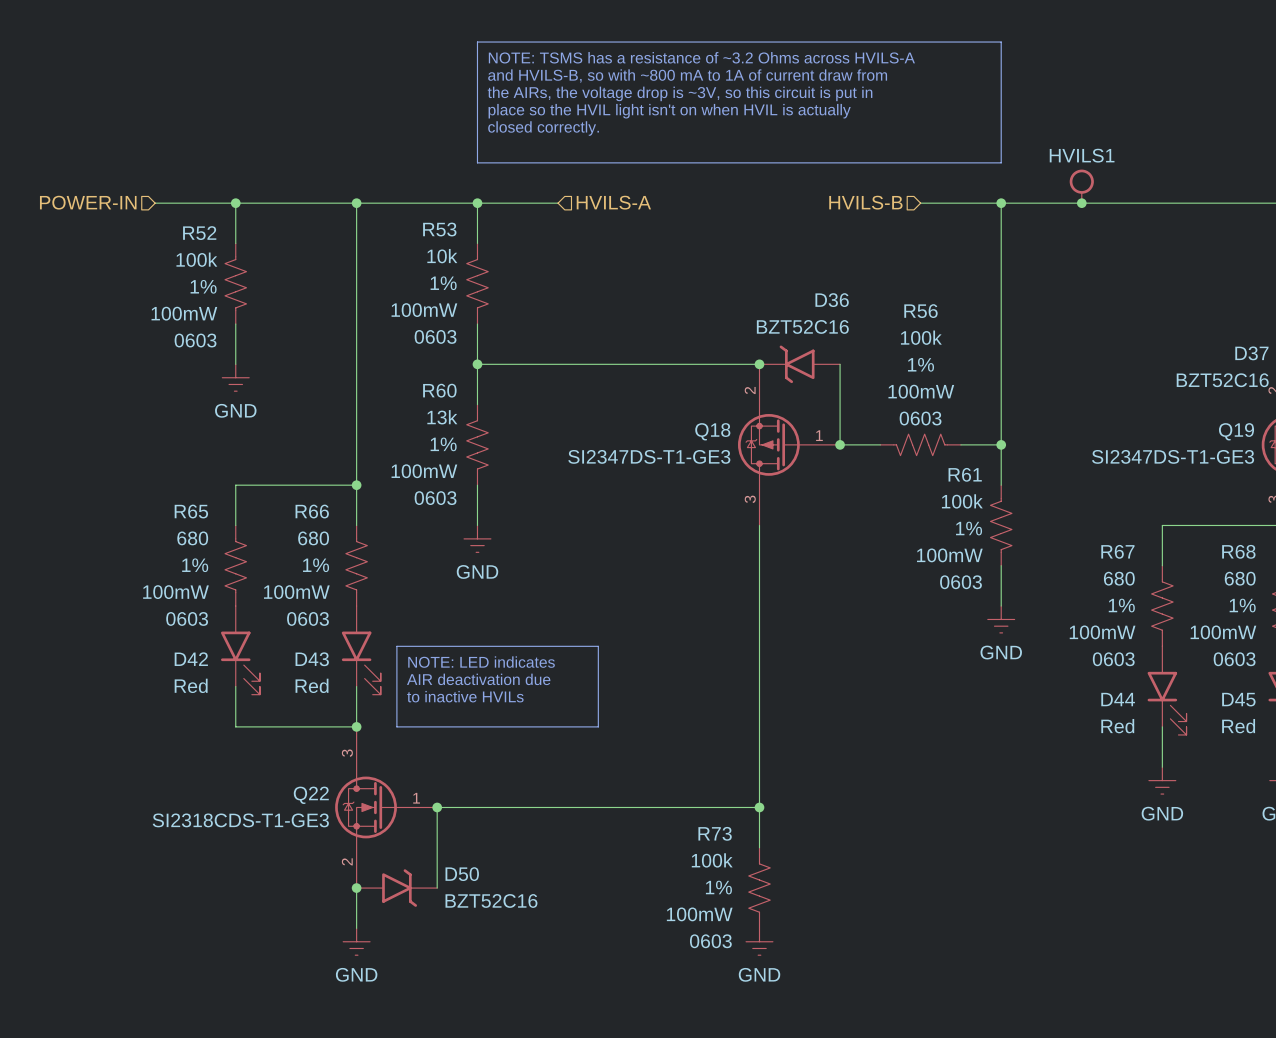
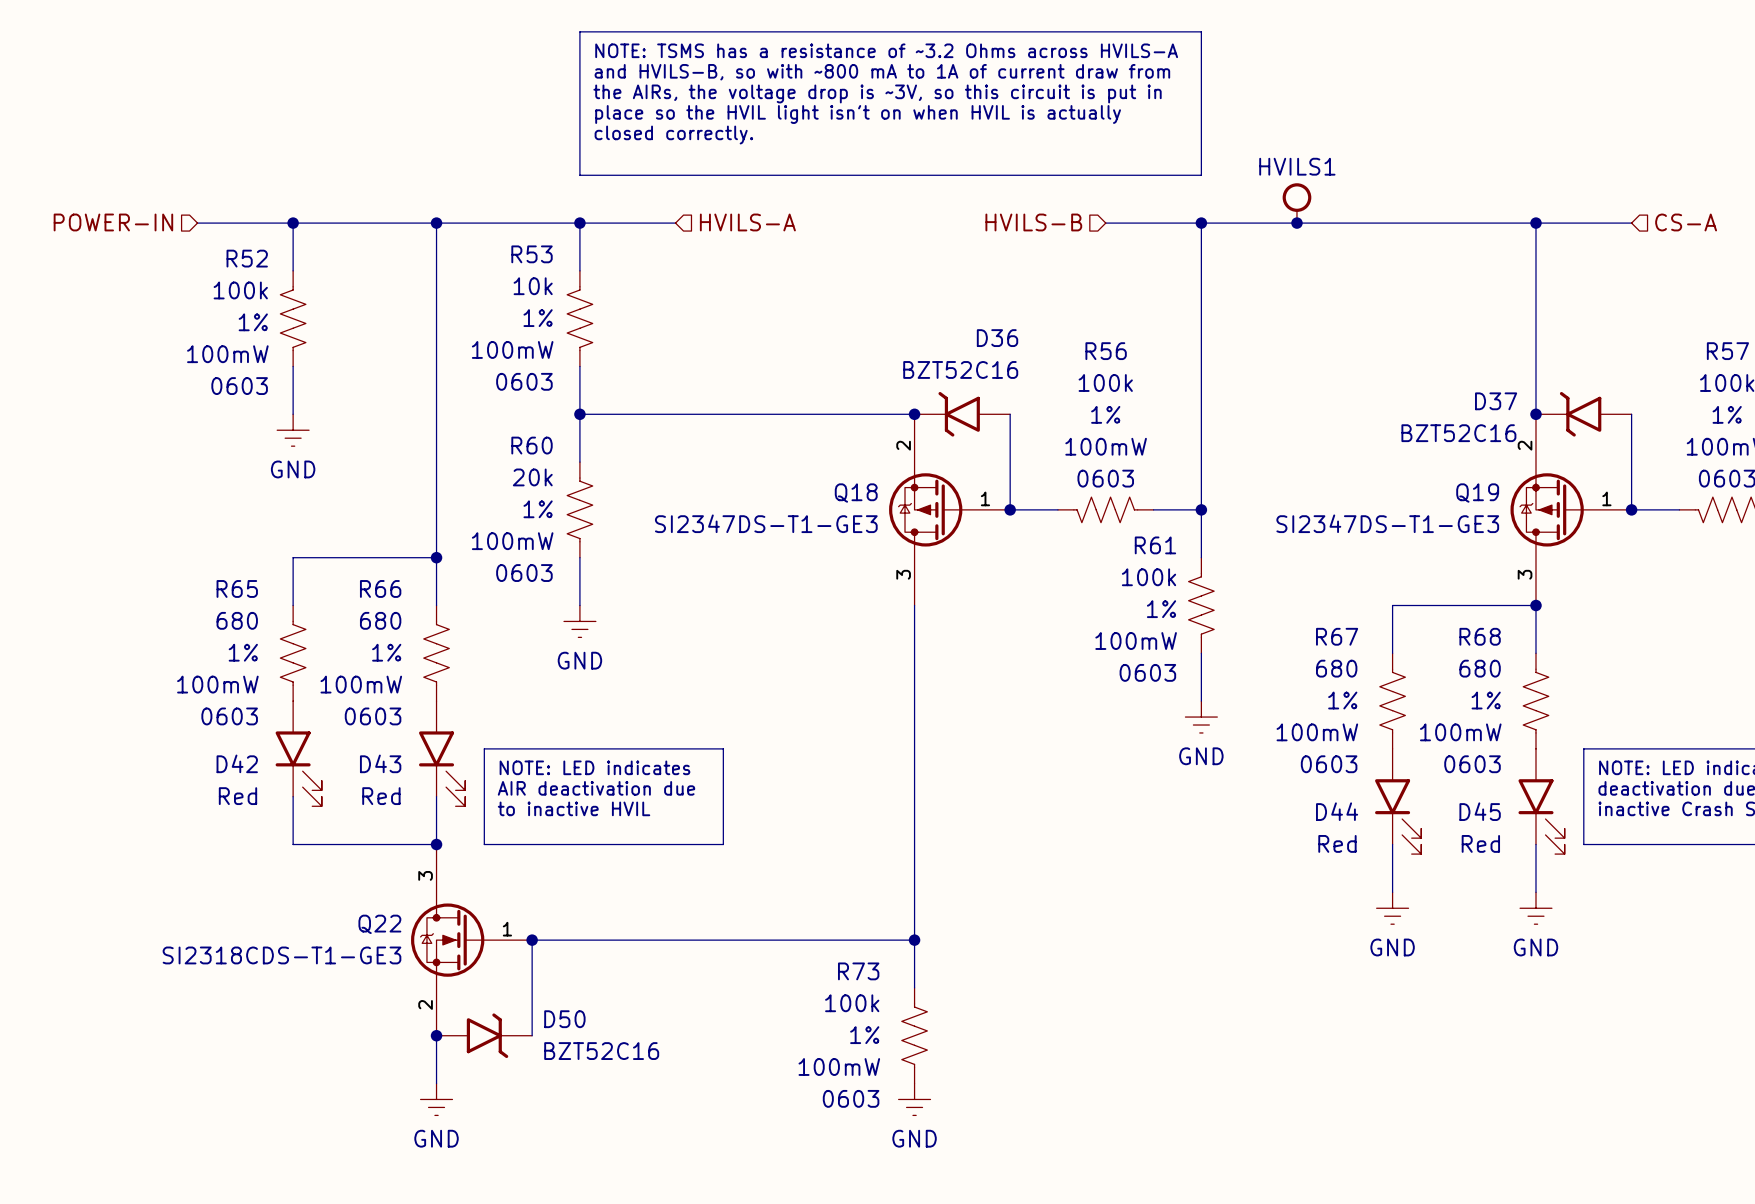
R60 value: 13k (442, 417) -> 20k (532, 477)
R60 flip: as is (477, 444) -> left-right (579, 509)
text: to inactive HVILs (465, 696) -> to inactive HVIL (574, 808)

